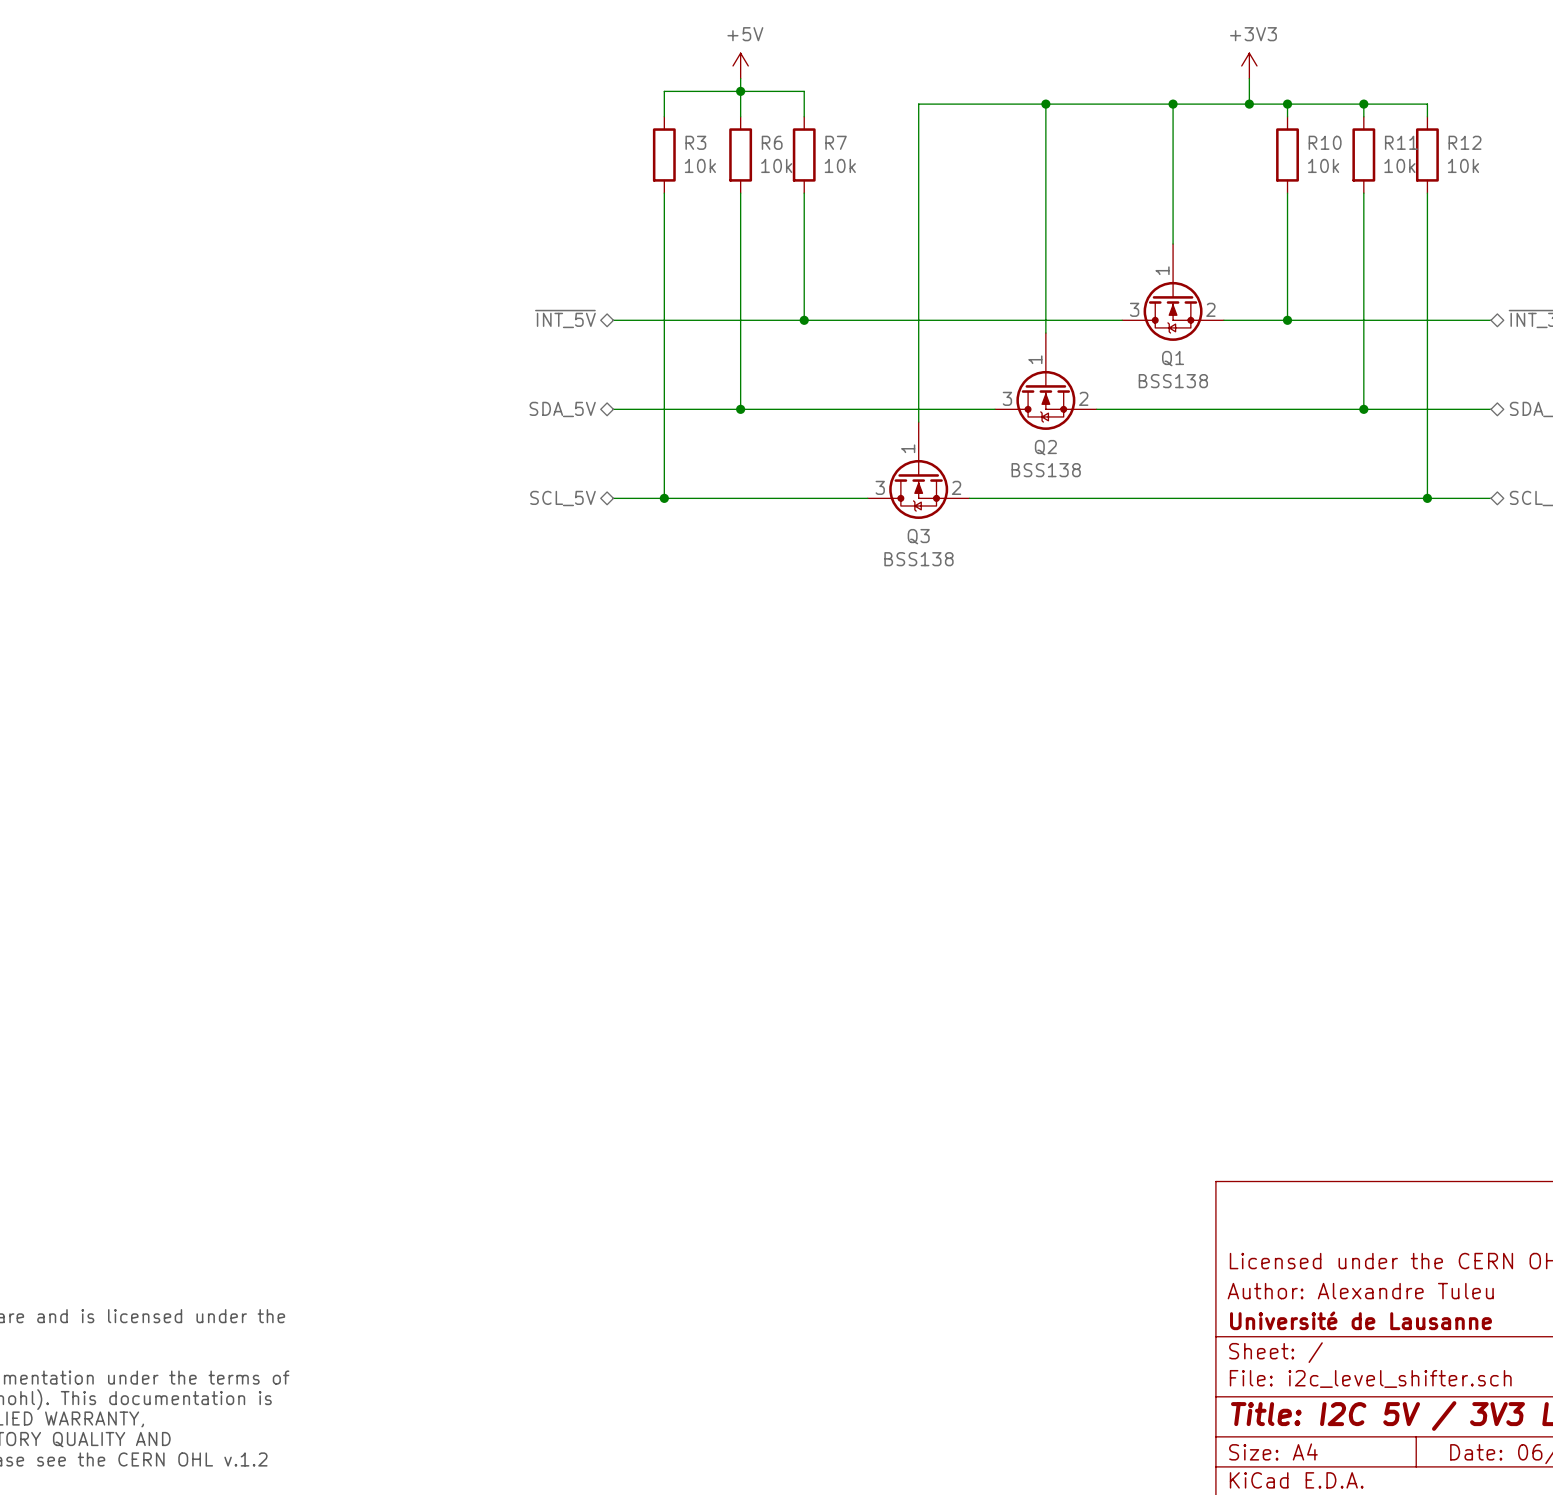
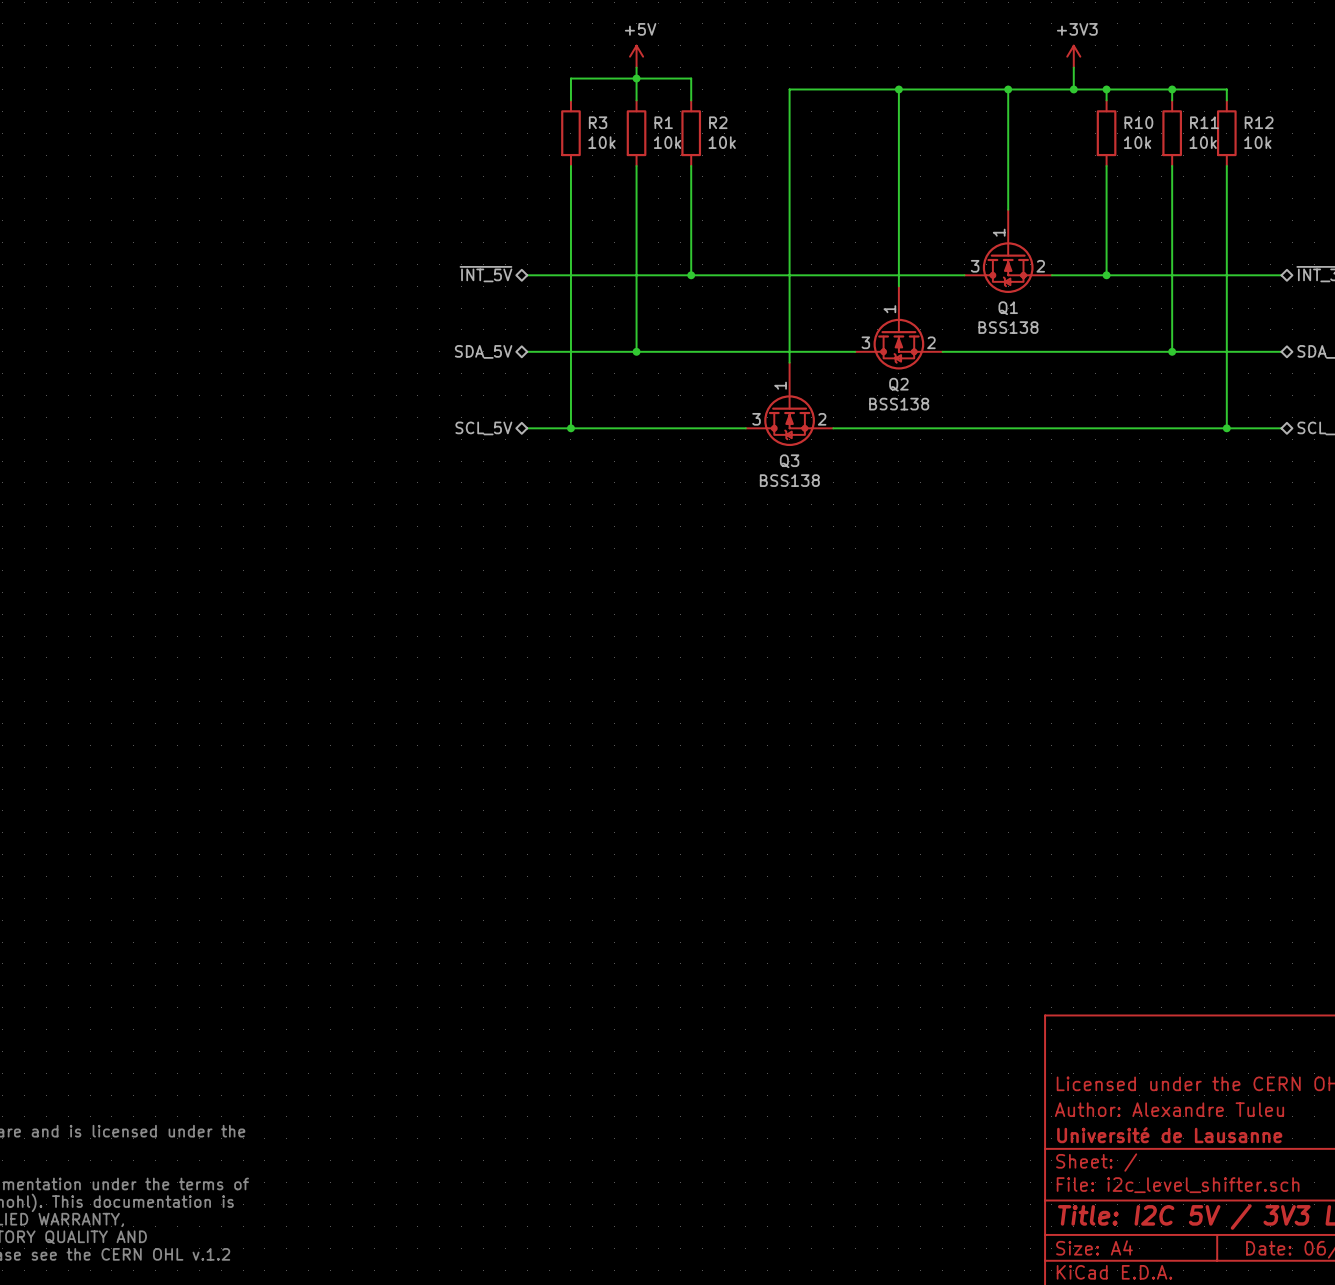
R6 name: R6 (772, 142) -> R1 (663, 122)
R7 name: R7 (836, 142) -> R2 (718, 122)

